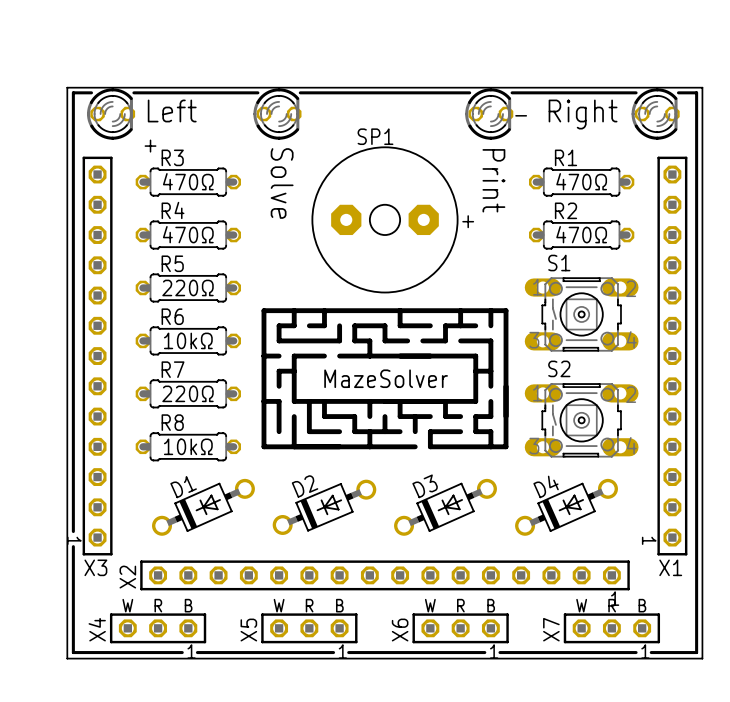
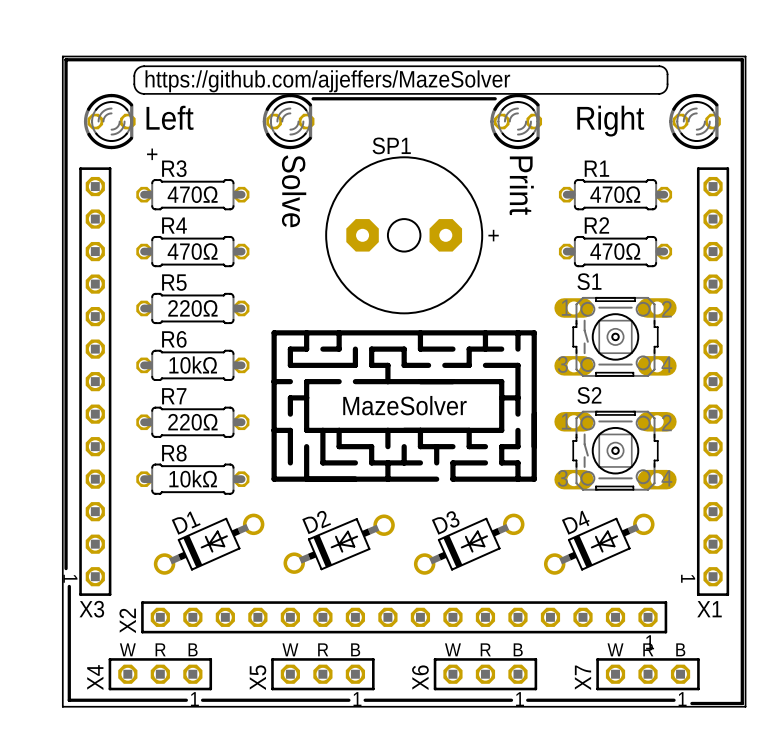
line: none -> (144, 66) (659, 66) (666, 71) (667, 85) (664, 91) (659, 93) (144, 93) (137, 91) (134, 84) (135, 71) (144, 66)
text: none -> https://github.com/ajjeffers/MazeSolver (327, 81)
board edge: (67, 87) (702, 87) (702, 658) -> (62, 93) (62, 56) (745, 56) (745, 706)
line: (91, 92) (73, 92) (73, 531) -> none
line: (133, 92) (257, 92) -> none
line: (512, 92) (636, 92) -> none
line: (678, 92) (696, 92) (696, 652) (651, 652) -> none
text: - (521, 115) -> none
line: none -> (66, 568) (66, 59) (742, 59) (742, 703) (691, 703)

